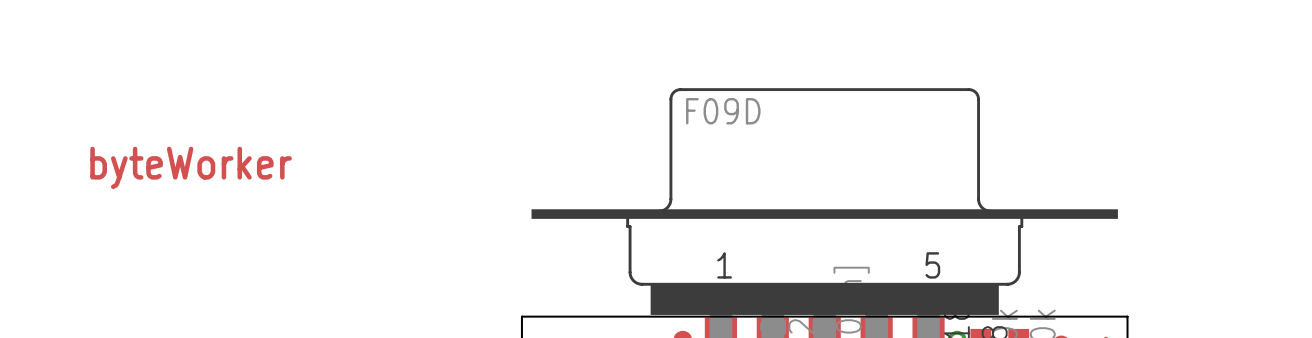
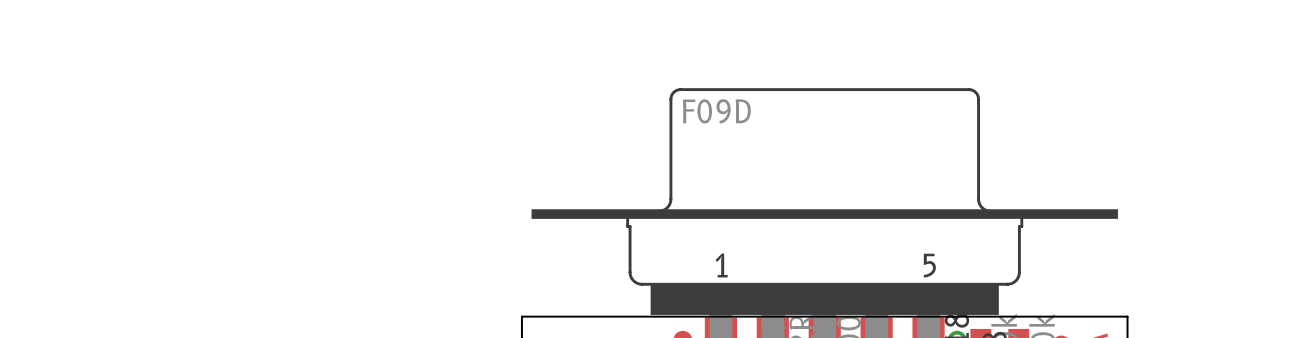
text: byteWorker (191, 167) -> none

